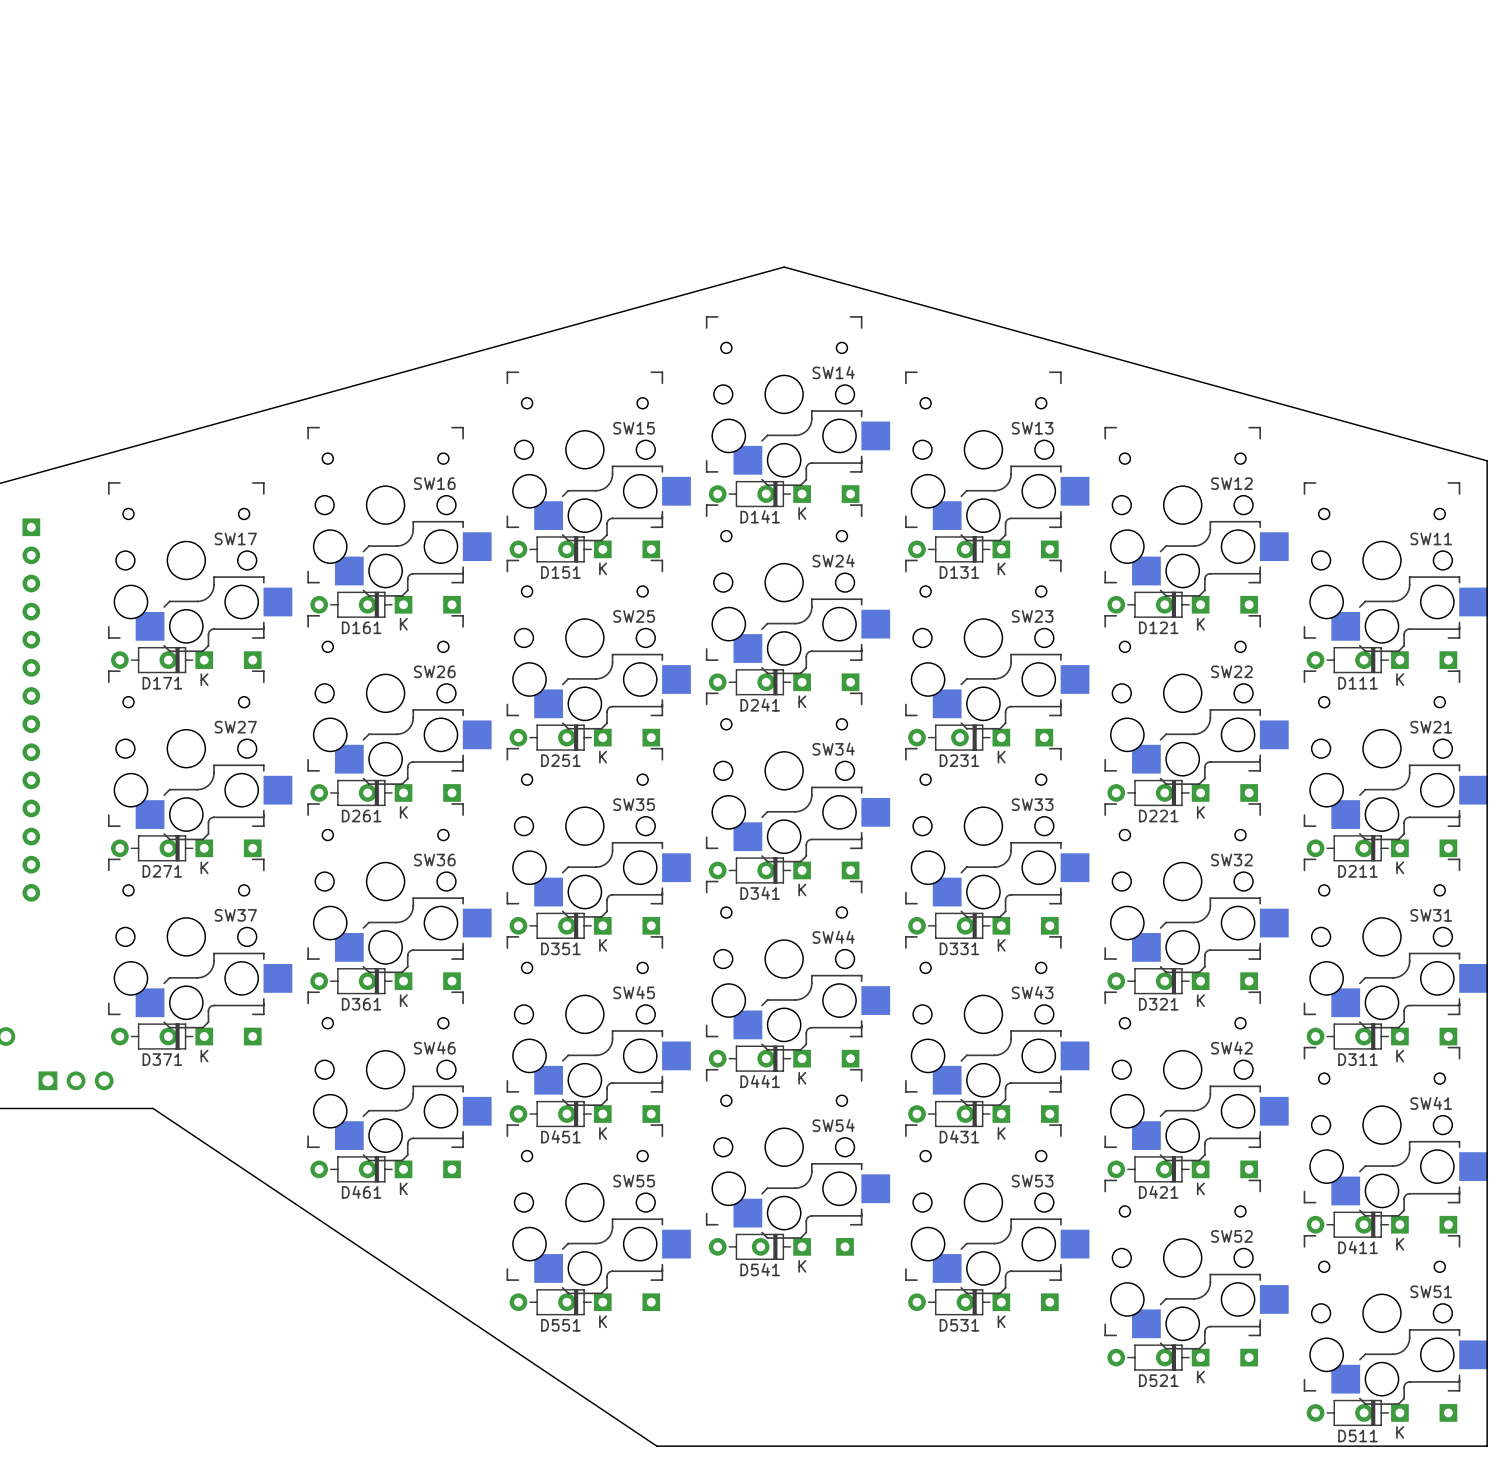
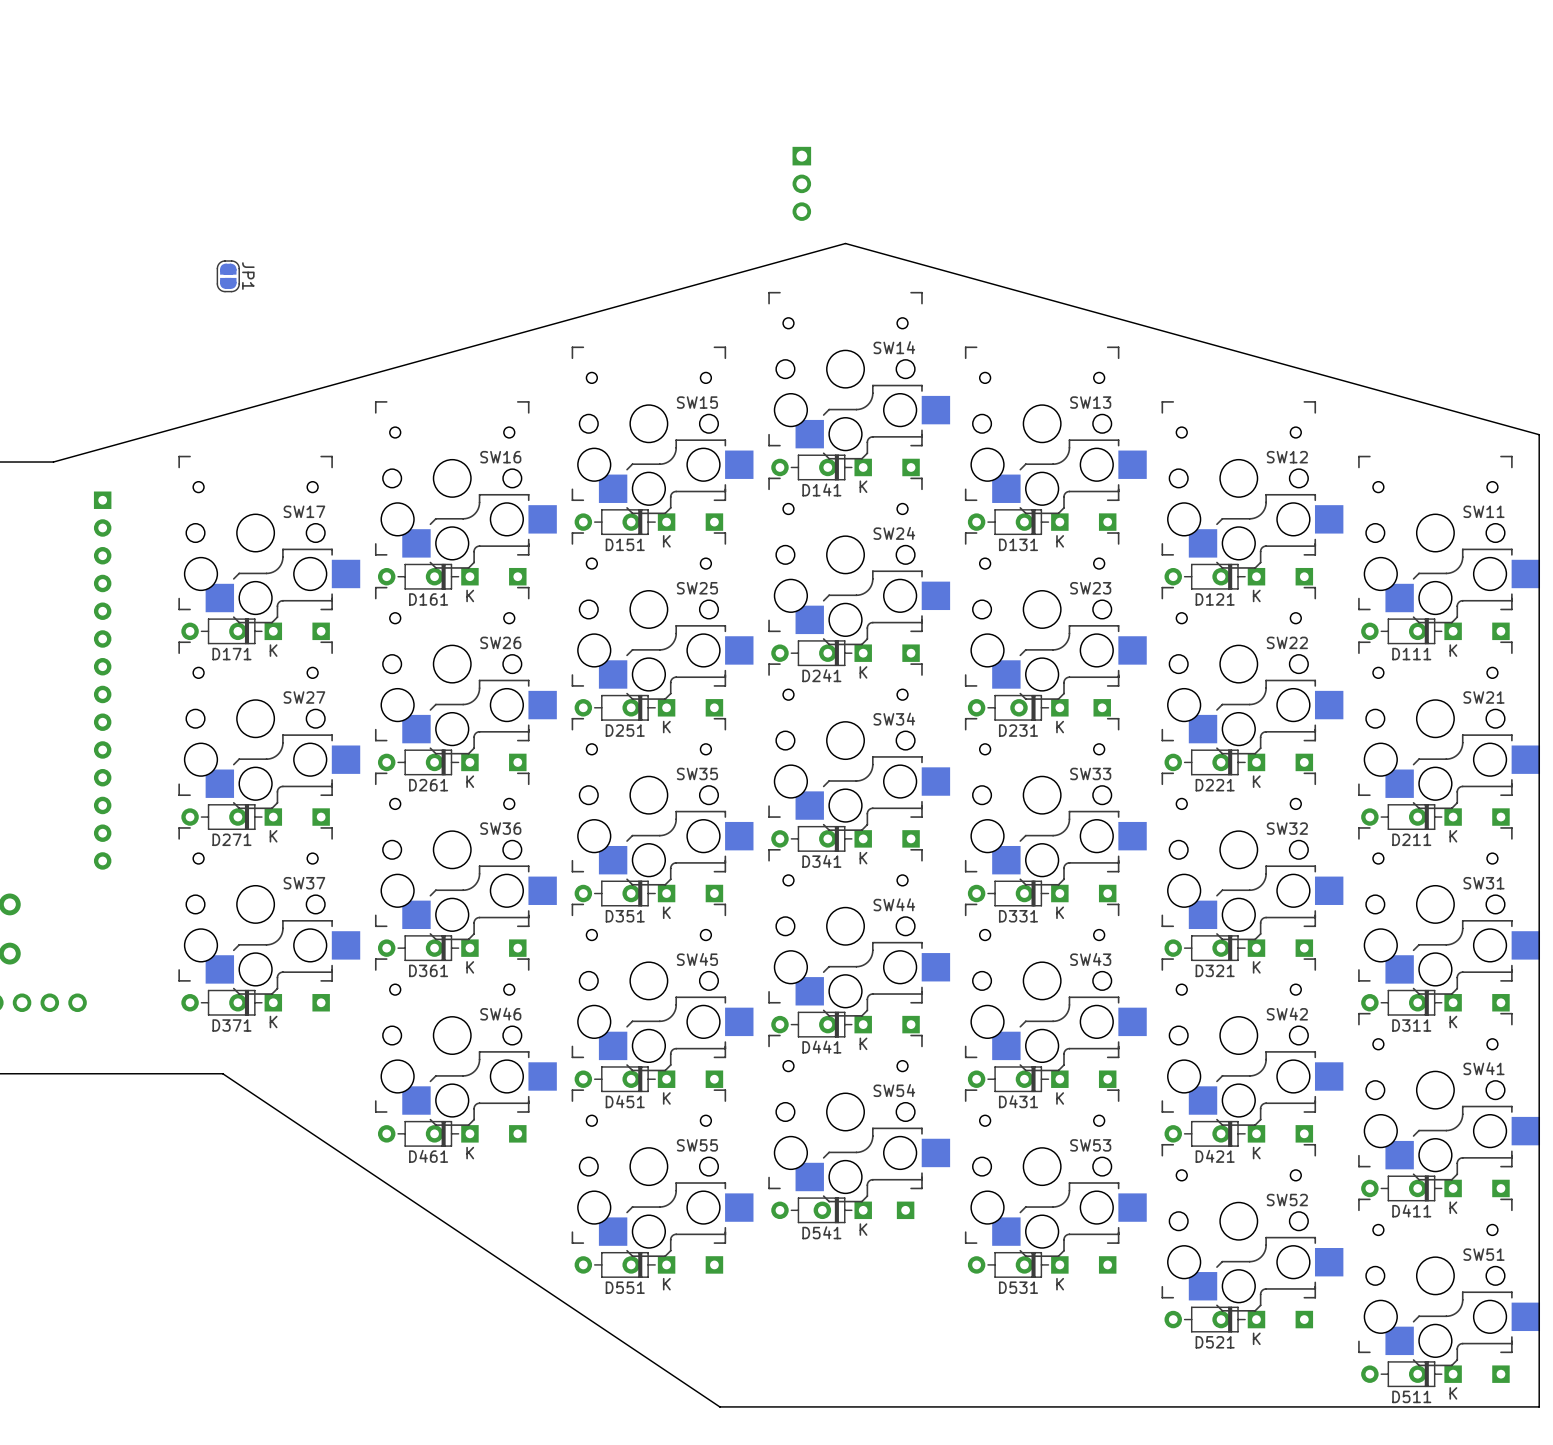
part: none -> (801, 183)
JP1: none -> (228, 276)
part: (76, 1080) -> none

